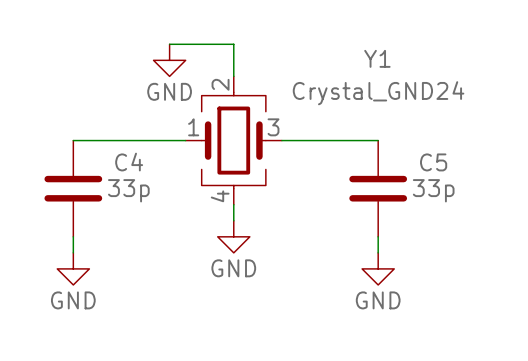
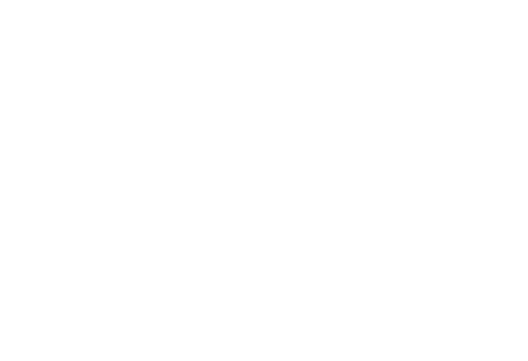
wire: (169, 44) (233, 44) (233, 76) -> none
power symbol: GND (169, 60) -> none
wire: (73, 140) (185, 140) -> none
Y1: Crystal_GND24 (233, 140) -> none
wire: (281, 140) (378, 140) -> none
C4: 33p (73, 188) -> none
C5: 33p (378, 188) -> none
wire: (233, 204) (233, 220) -> none
wire: (73, 236) (73, 252) -> none
power symbol: GND (233, 236) -> none
wire: (378, 236) (378, 252) -> none
power symbol: GND (73, 268) -> none
power symbol: GND (378, 268) -> none

